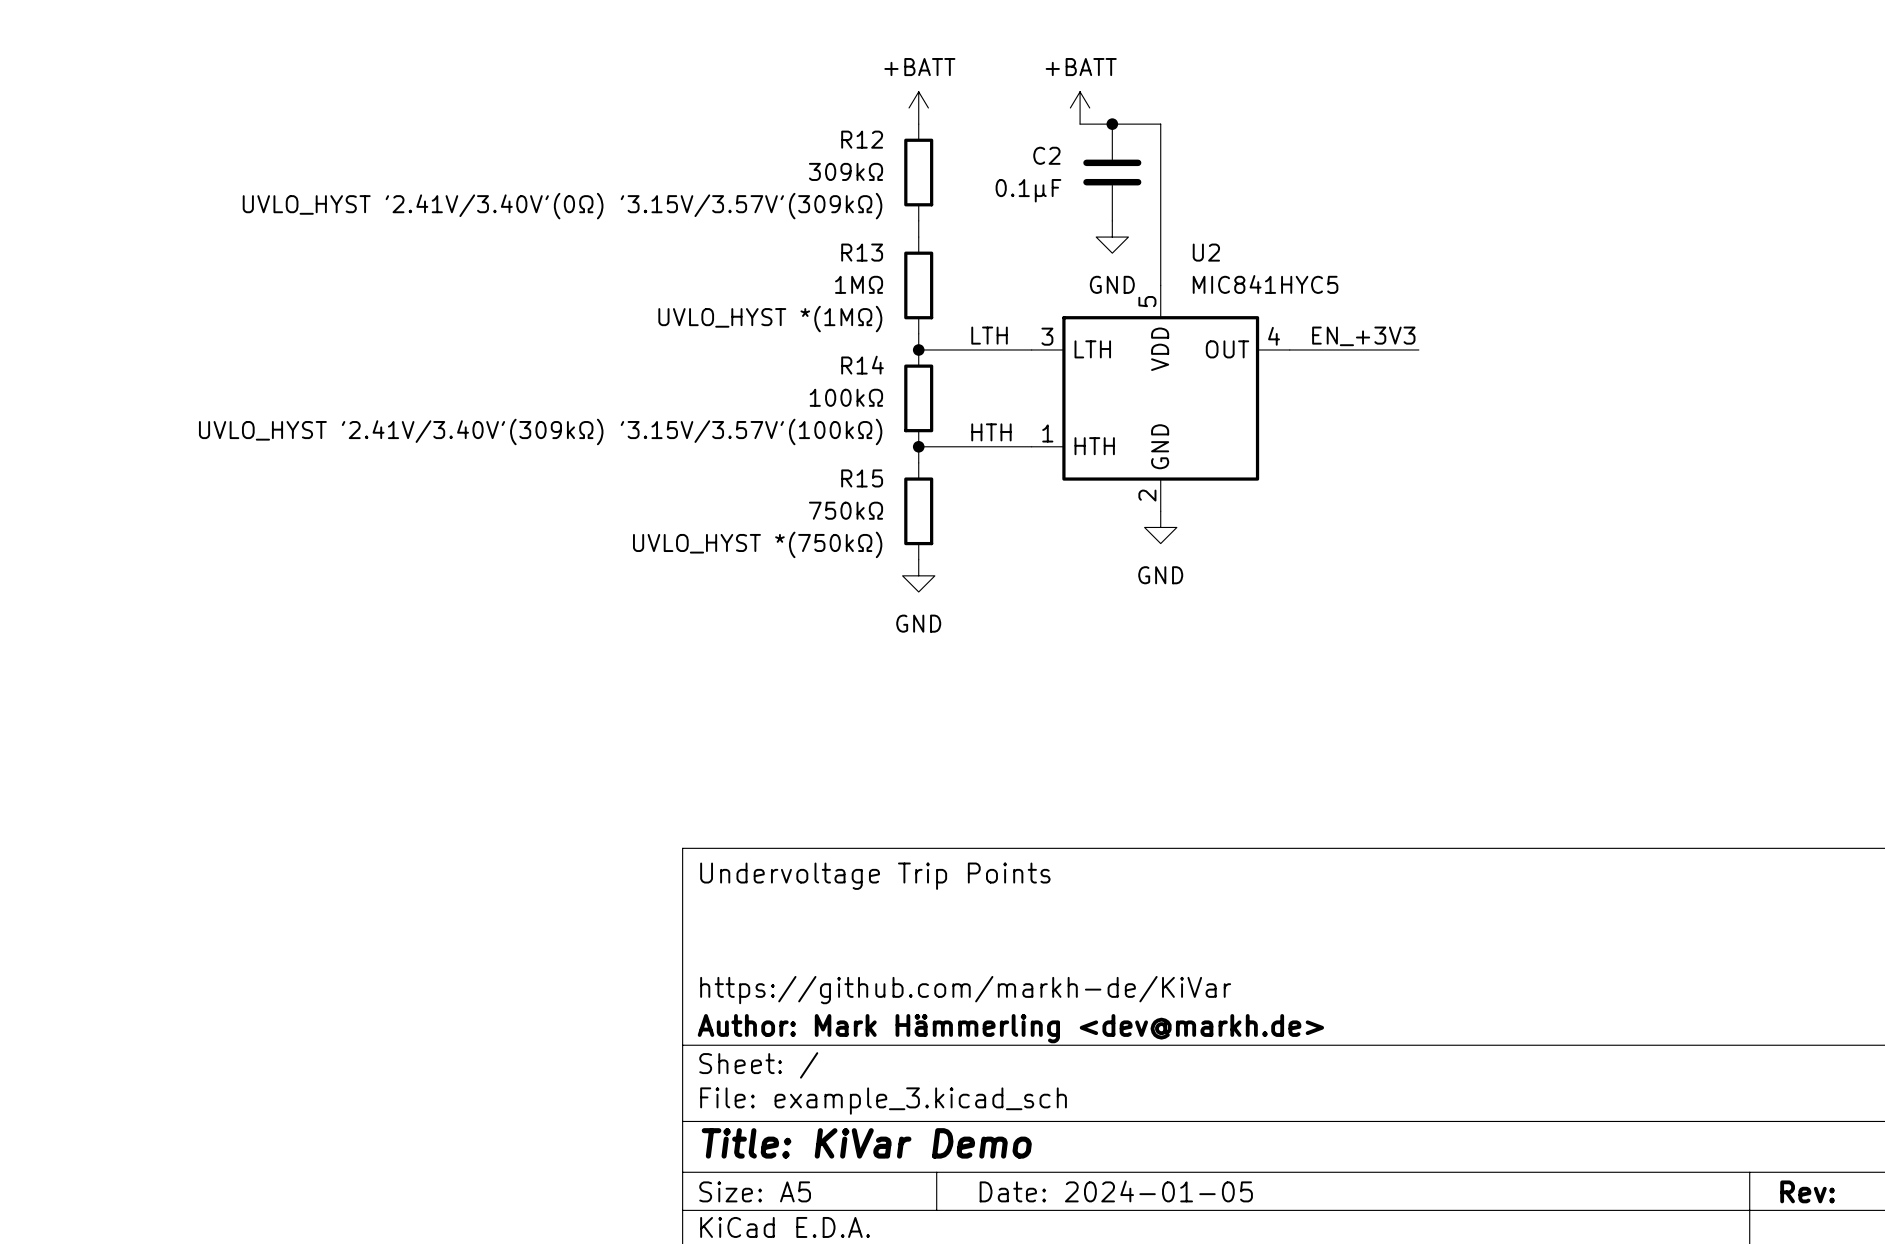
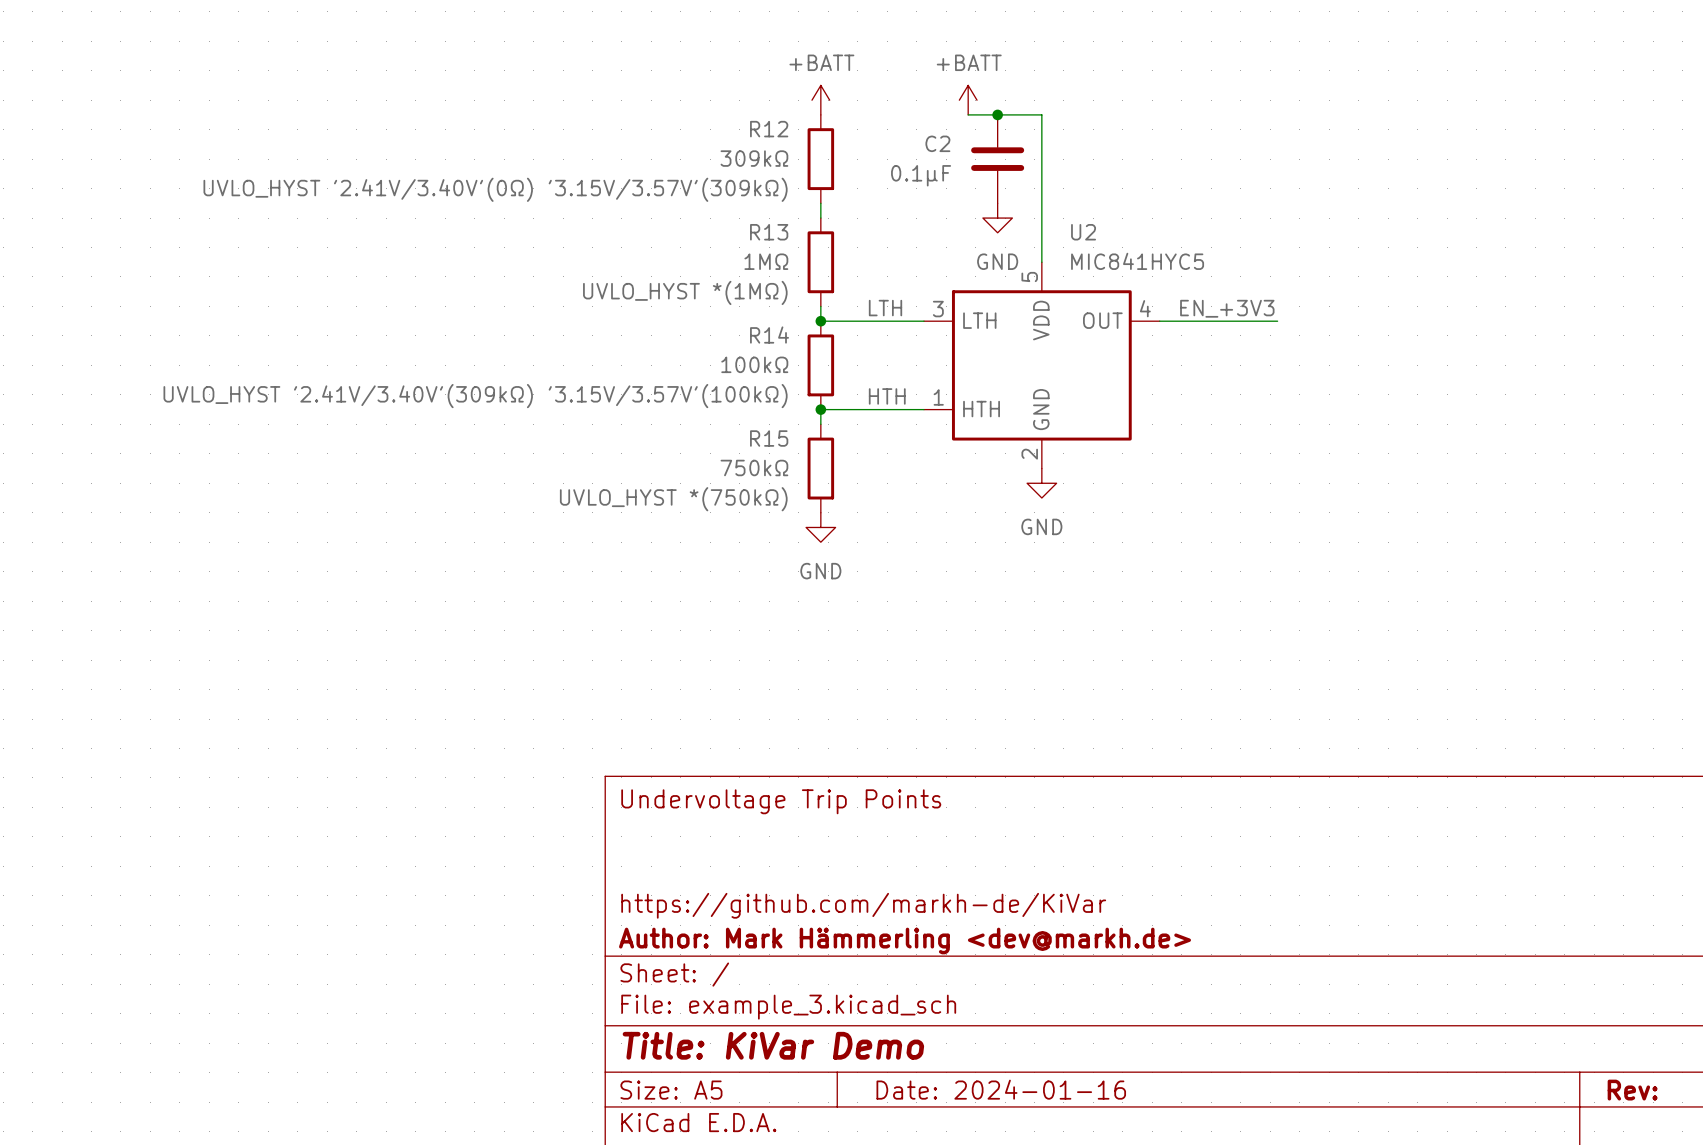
title block: Date: 2024-01-05 (1116, 1191) -> Date: 2024-01-16 (1001, 1089)

